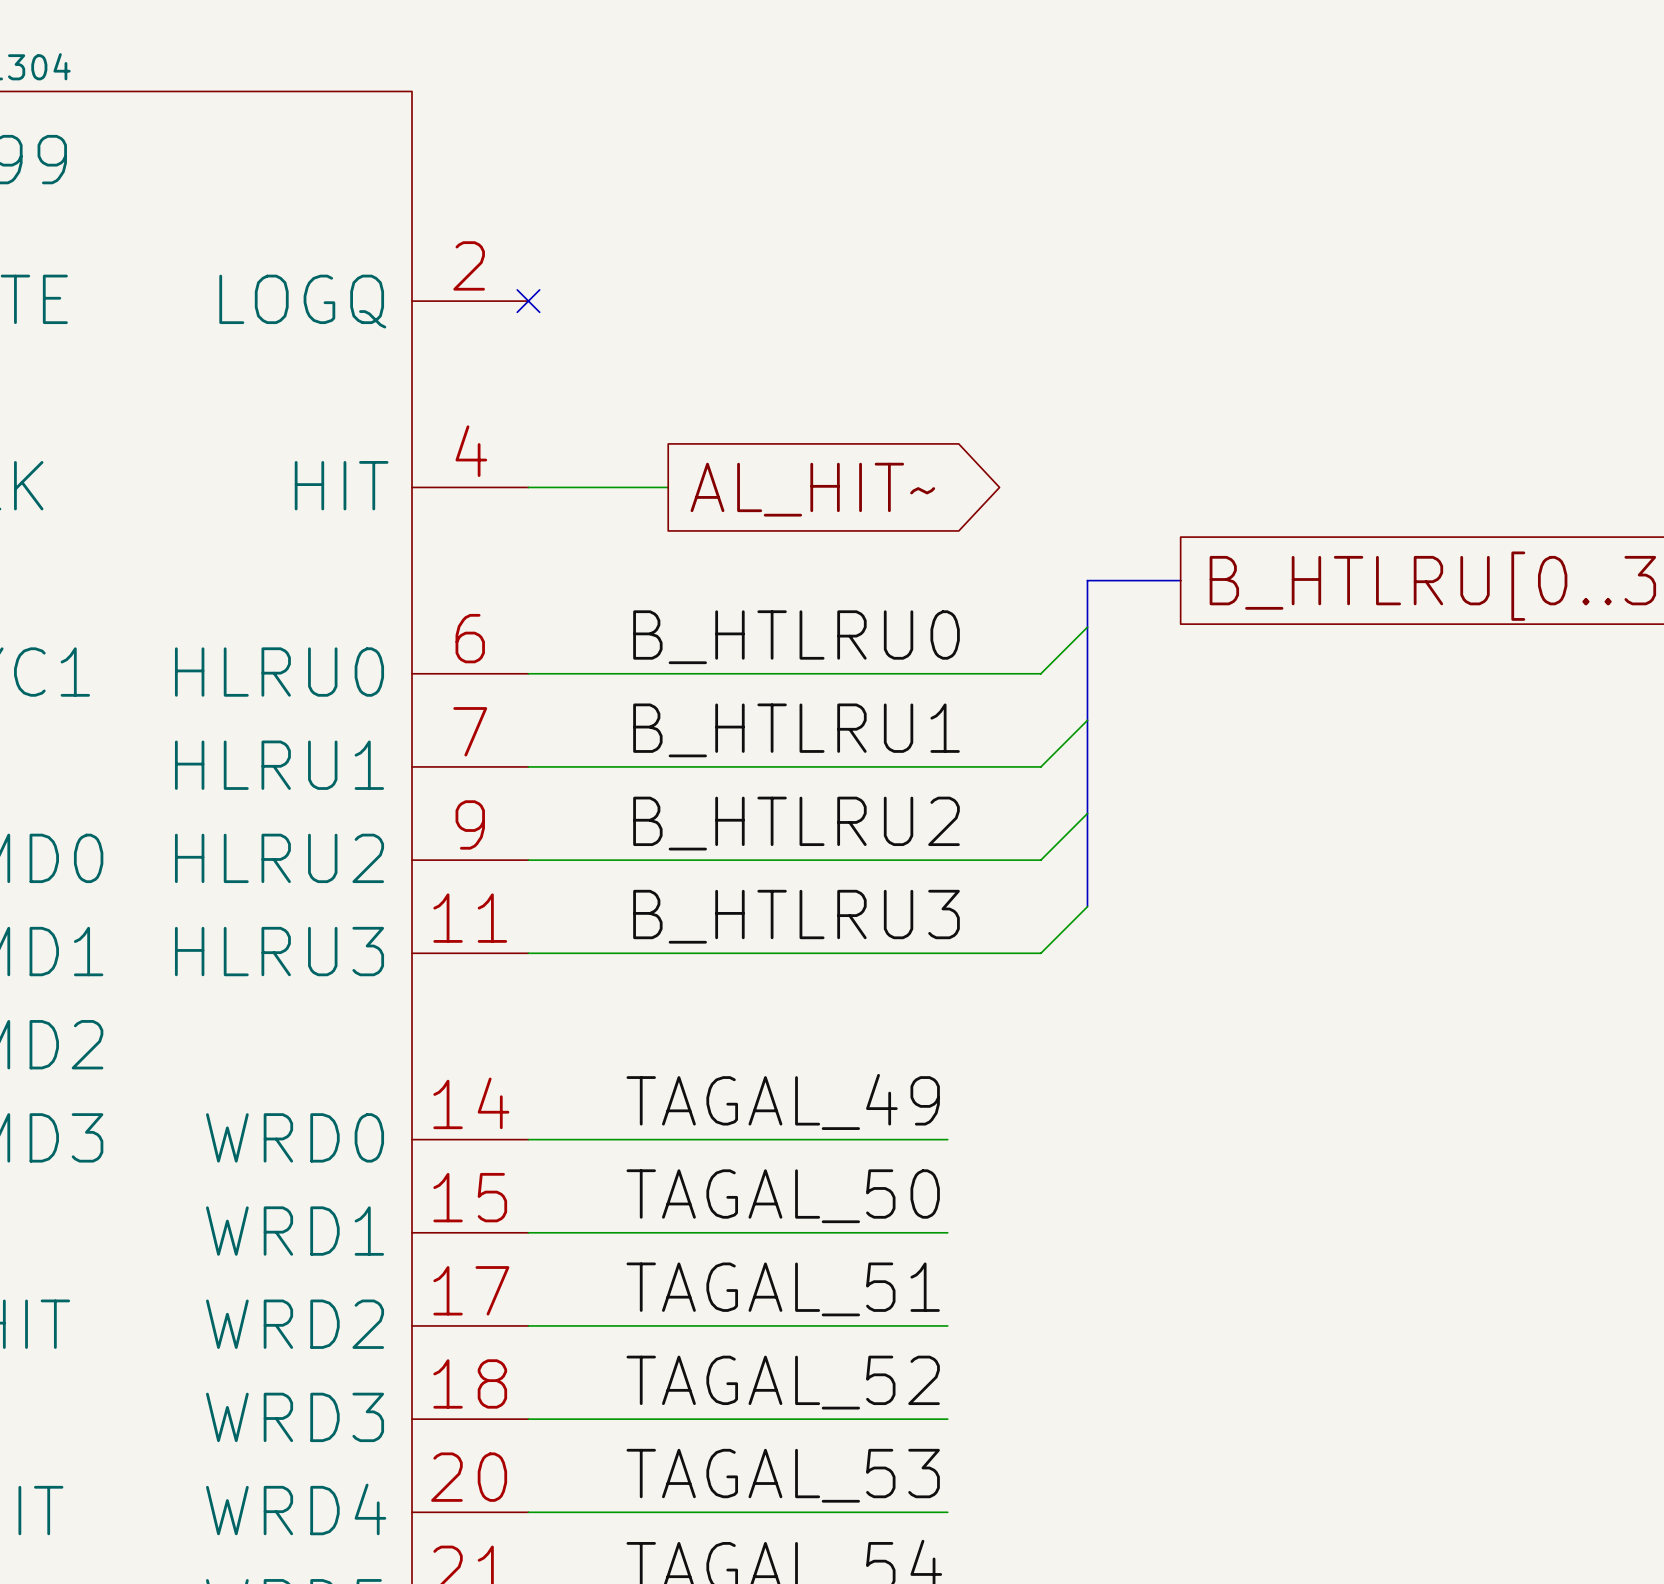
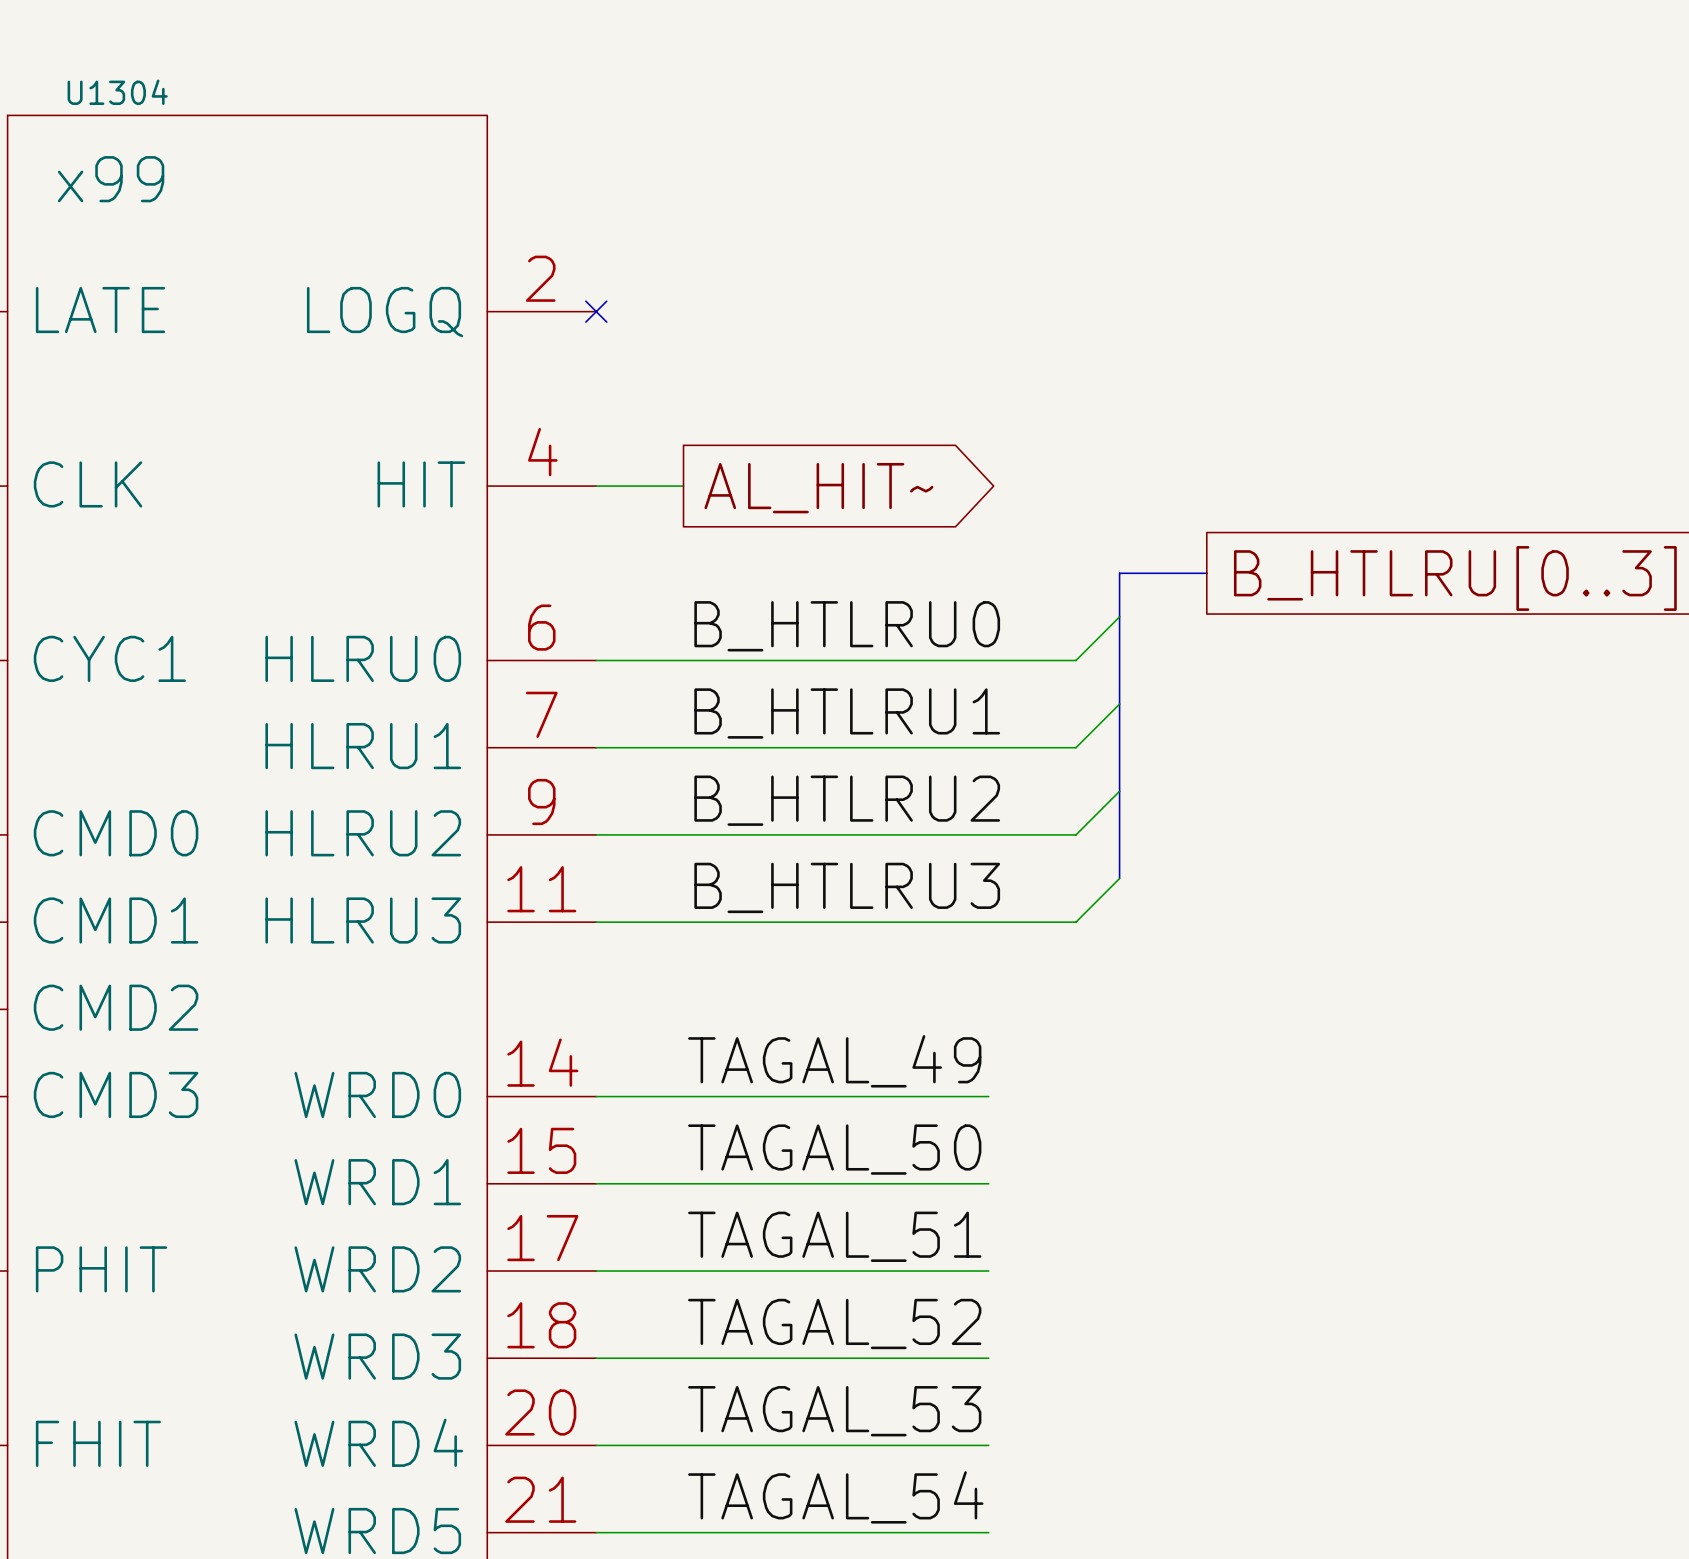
wire: (621, 487) (668, 487) -> none
global label position: AL_HIT~ (812, 489) -> AL_HIT~ (818, 488)

